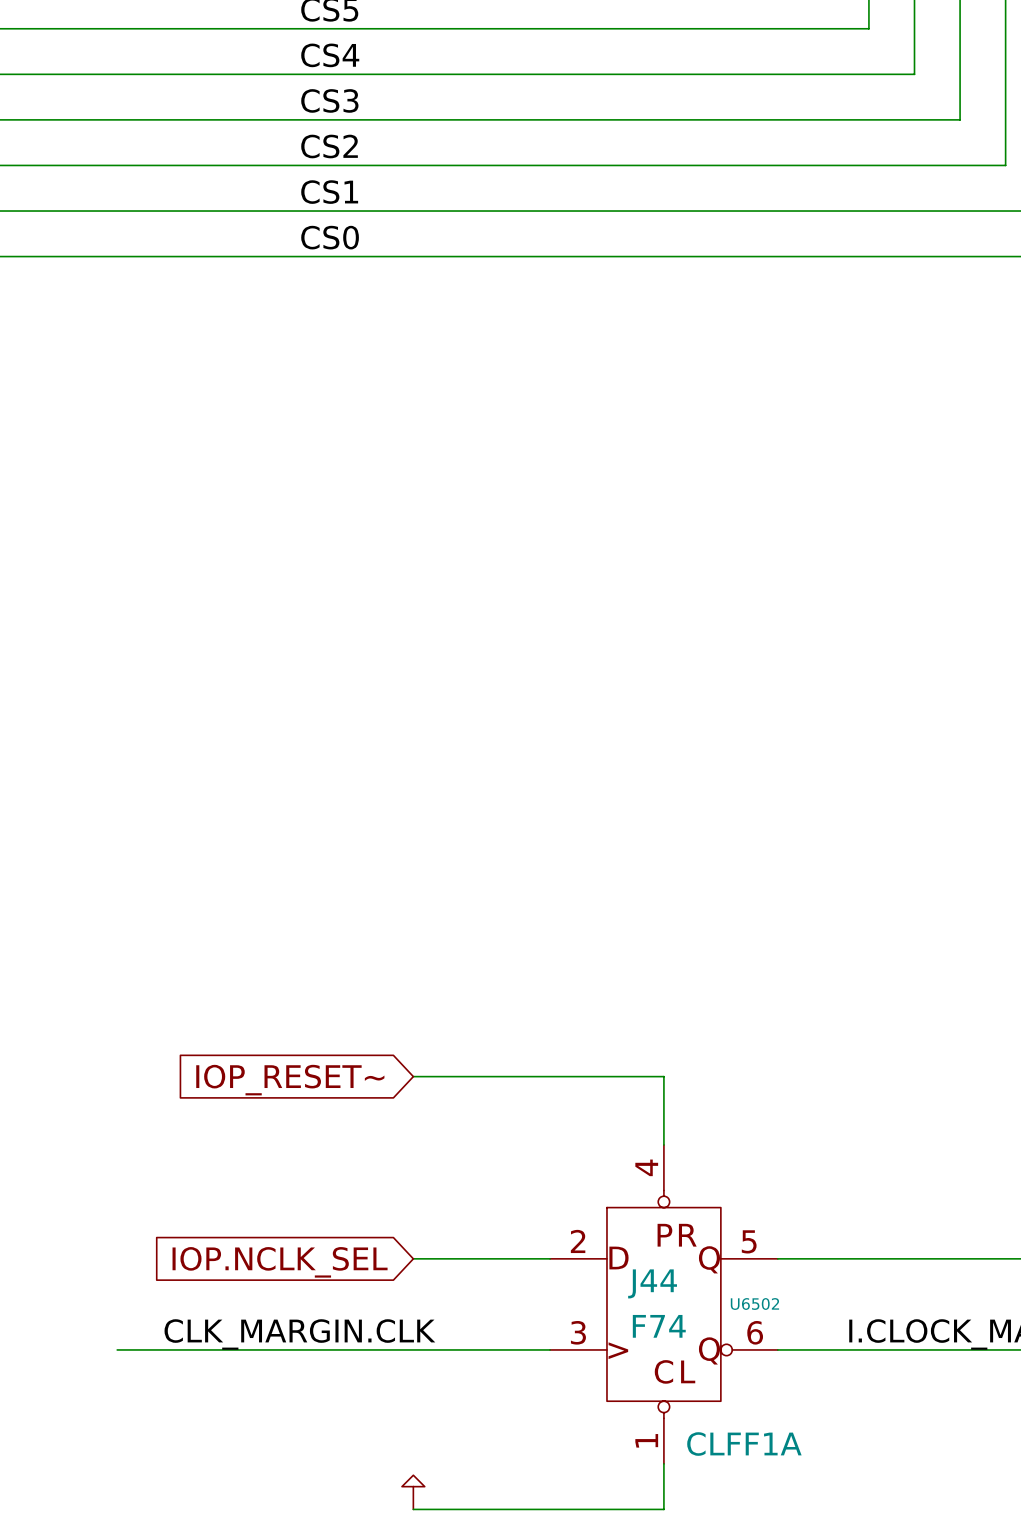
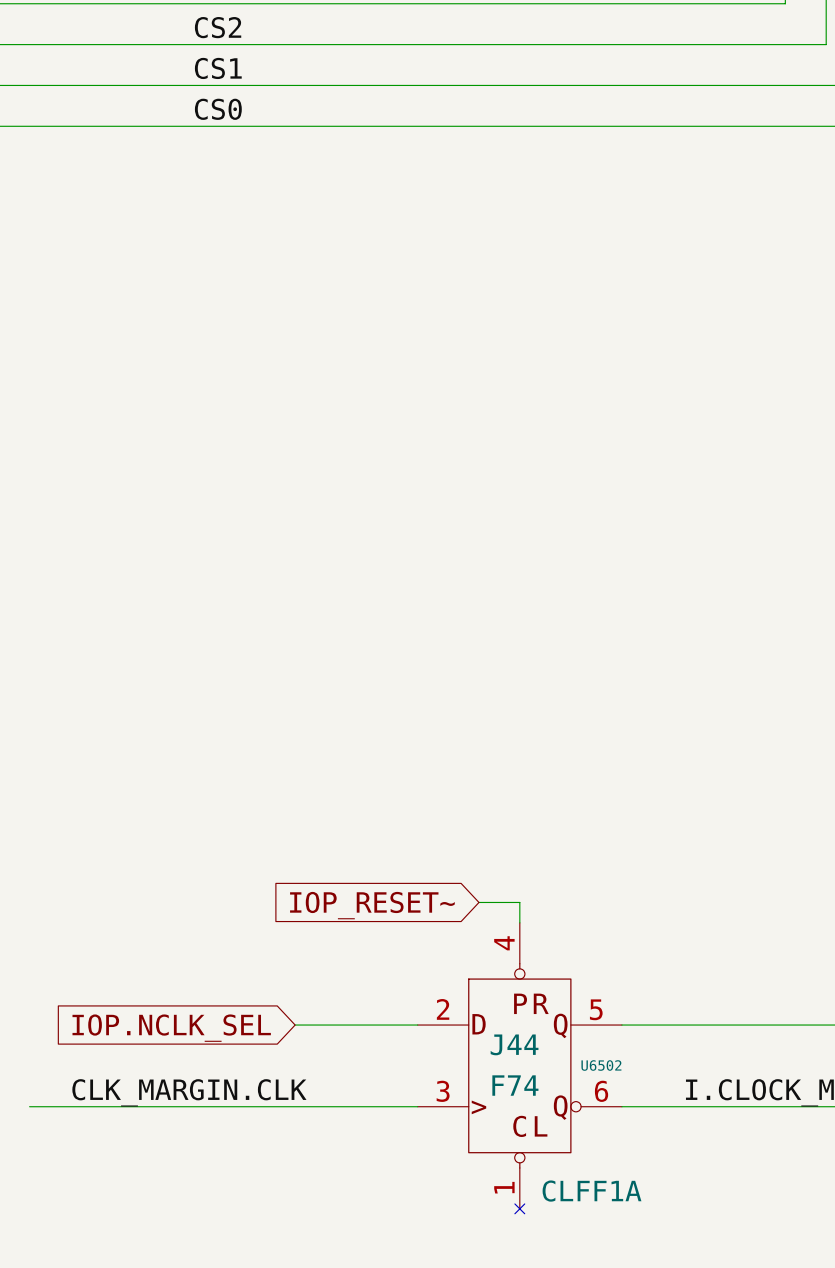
wire: (413, 1076) (663, 1076) (663, 1122) -> (478, 902) (519, 902)
global label position: IOP_RESET~ (290, 1080) -> IOP_RESET~ (372, 905)
wire: (663, 1463) (663, 1509) (413, 1509) -> none
no-connect mark: none -> (519, 1208)
power symbol: (413, 1492) -> none

